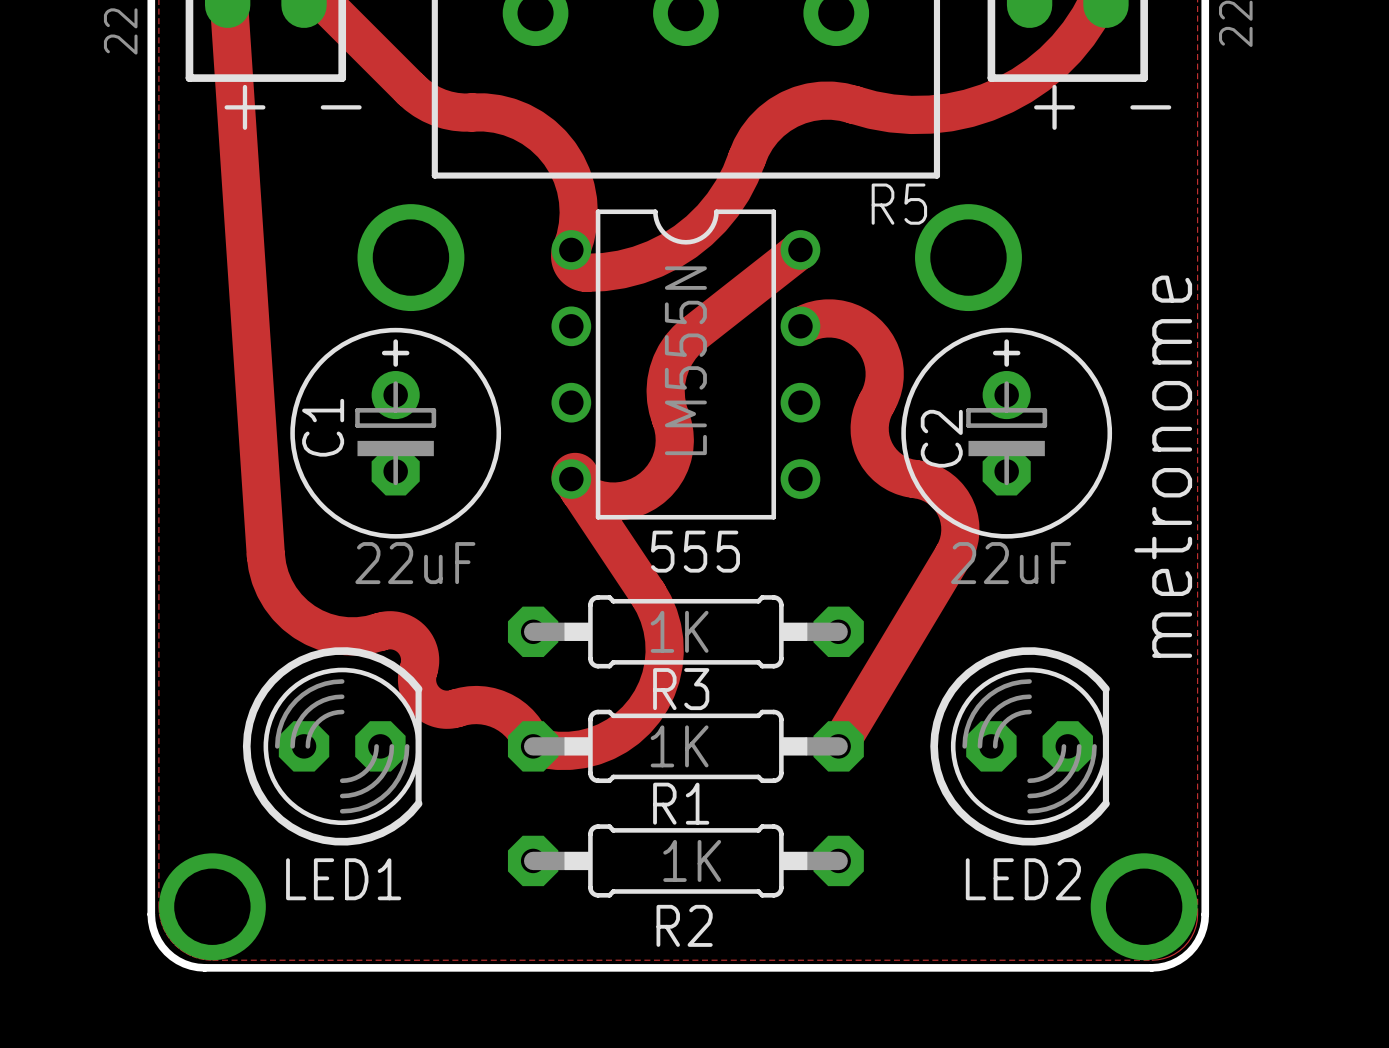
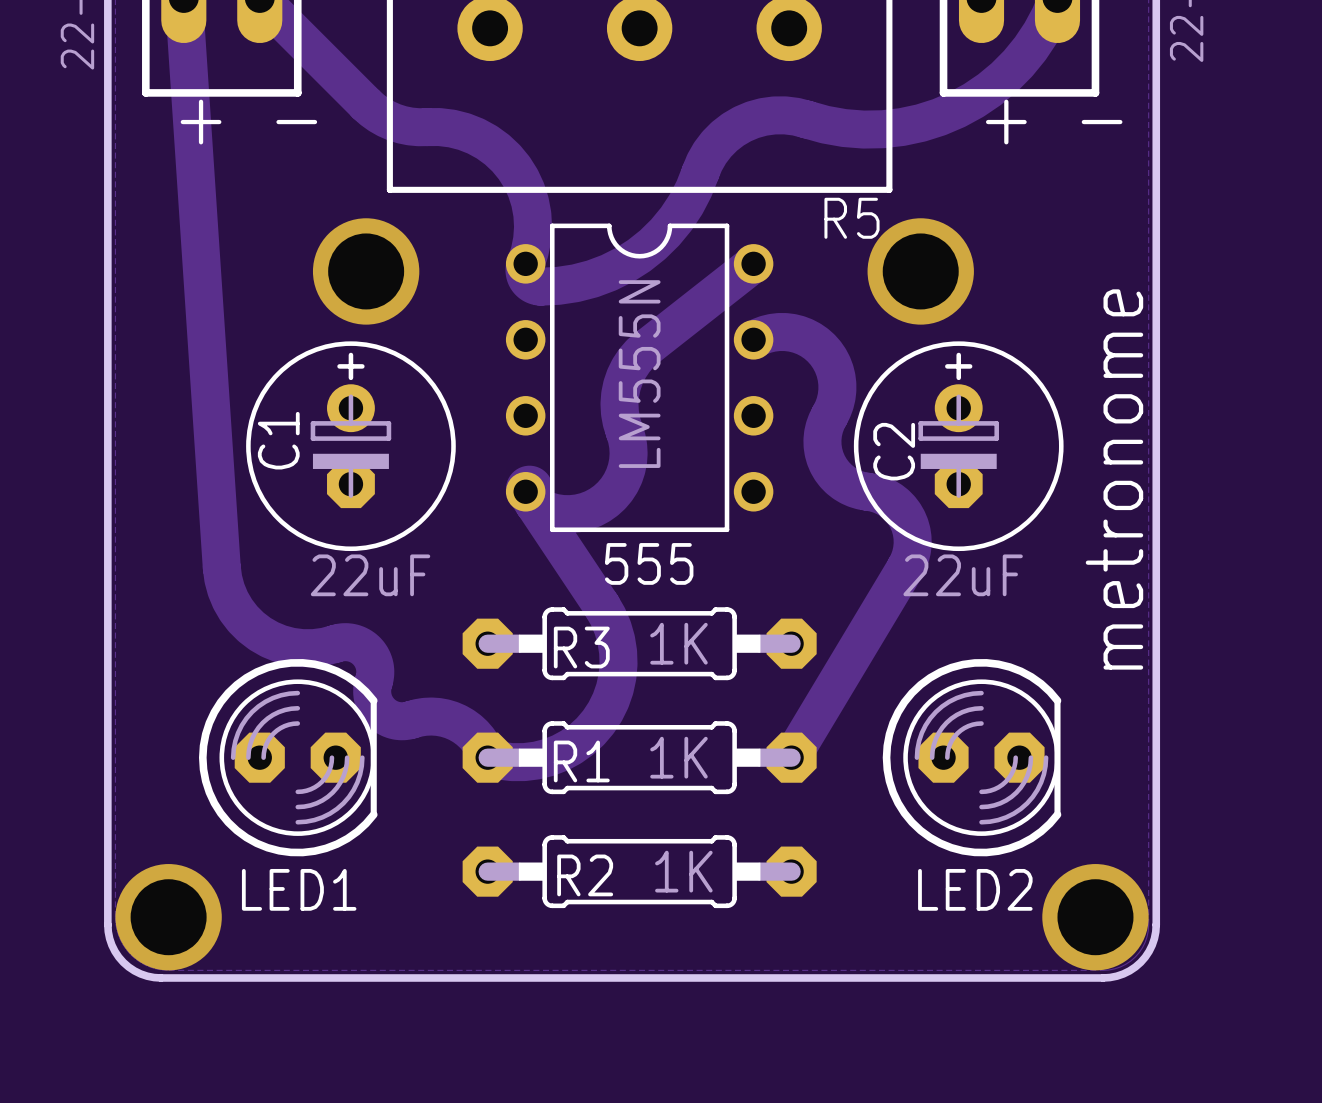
R3 value position: 1K (679, 631) -> 1K (678, 643)
R3 name position: R3 (681, 689) -> R3 (581, 647)
R1 value position: 1K (679, 746) -> 1K (678, 757)
R1 name position: R1 (681, 803) -> R1 (581, 761)
R2 value position: 1K (692, 860) -> 1K (683, 871)
R2 name position: R2 (684, 925) -> R2 (585, 875)

